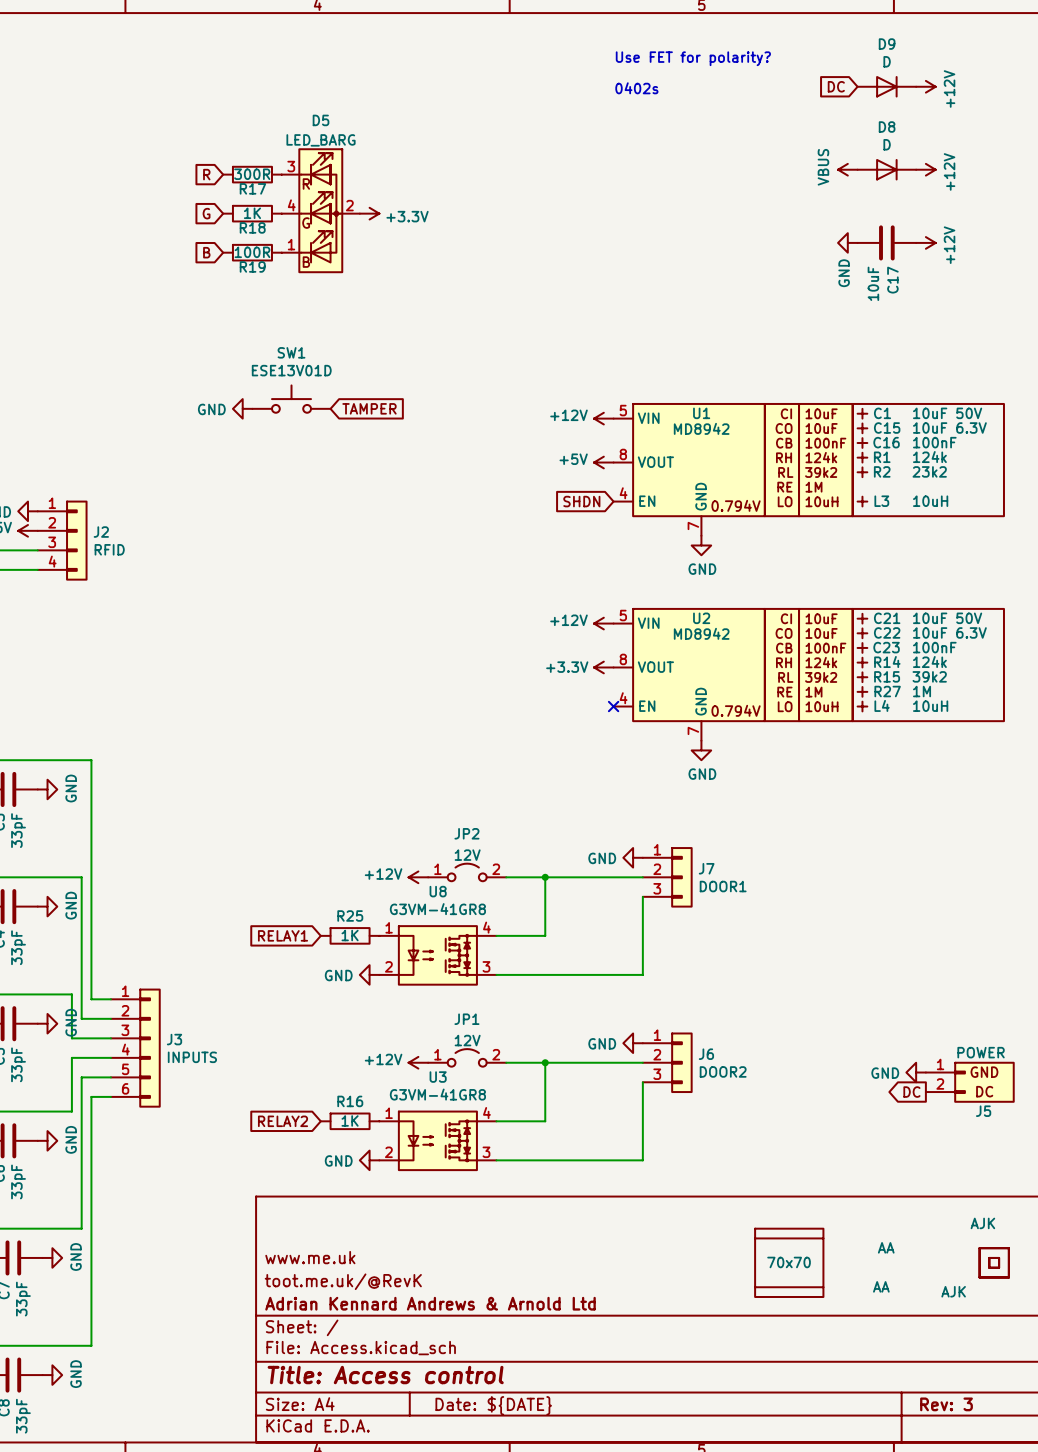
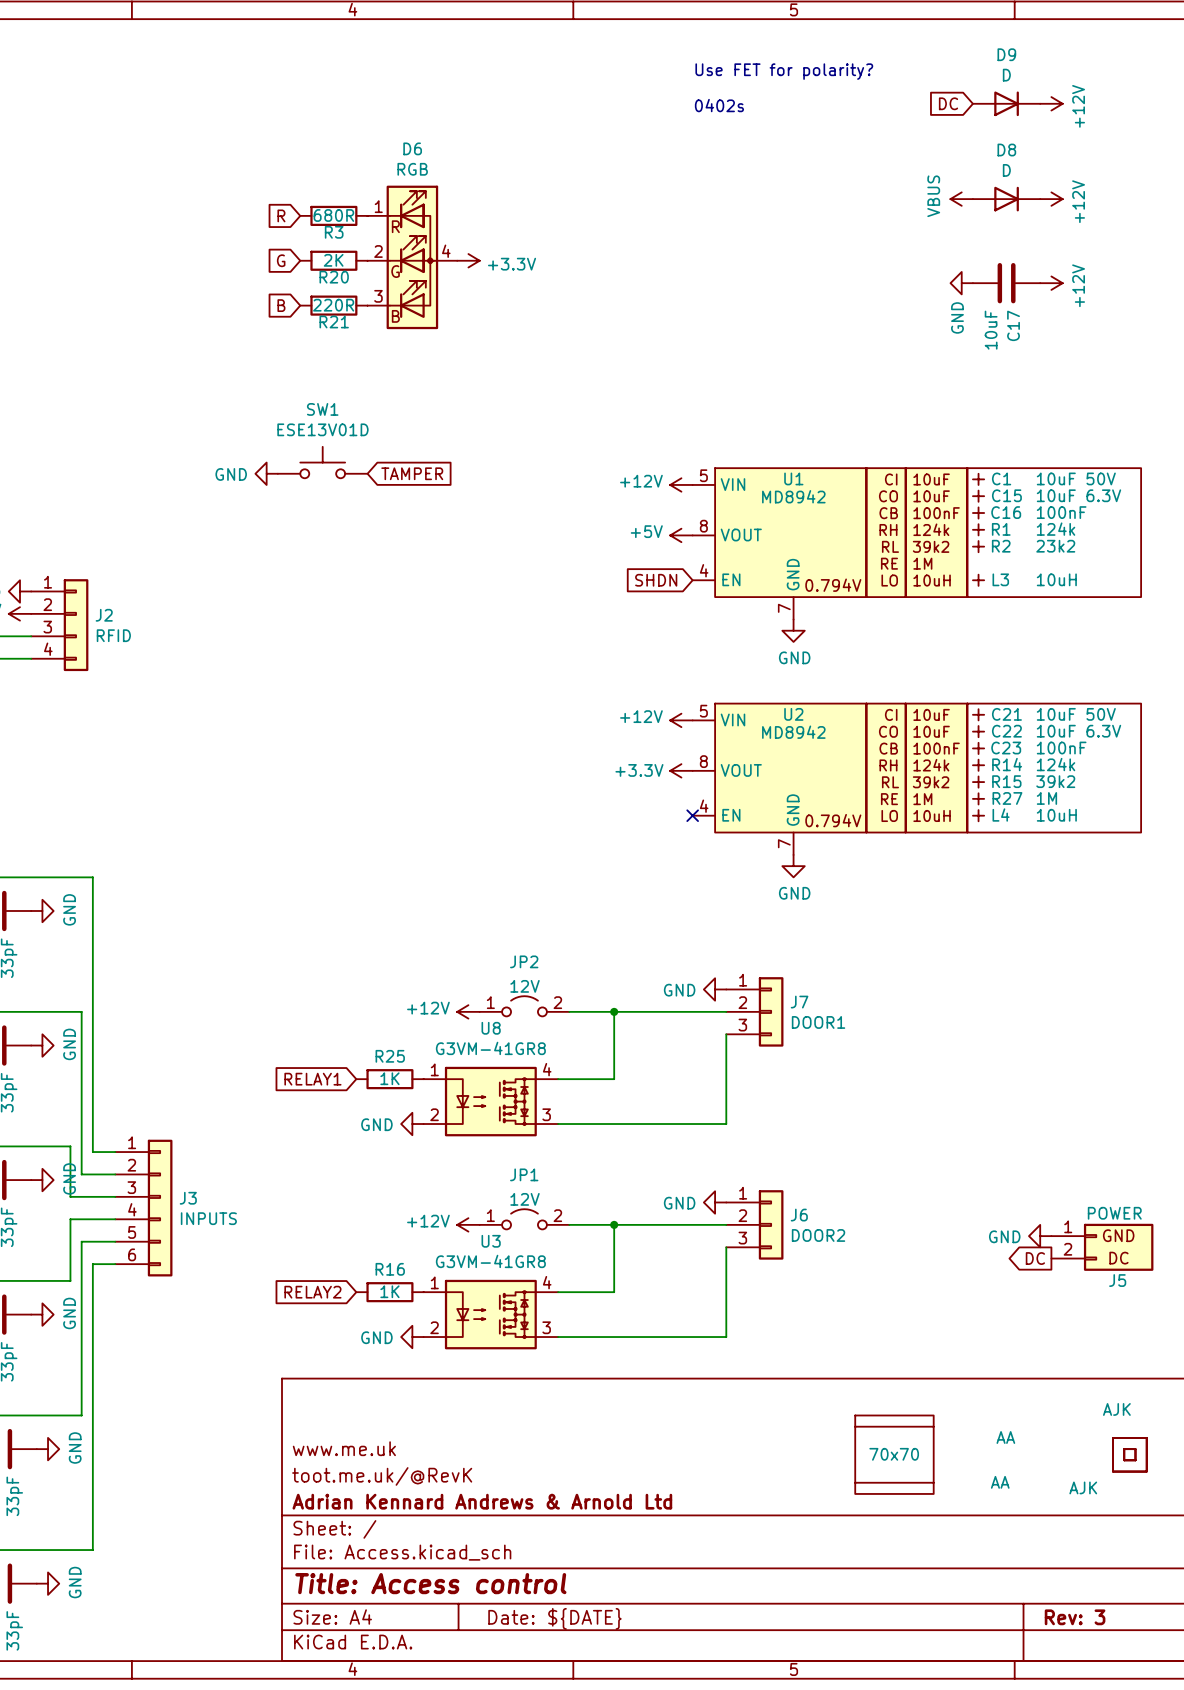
global label position: R (206, 174) -> R (281, 215)
R17: 300R (252, 174) -> none
R3: none -> 680R (333, 215)
D5: LED_BARG (320, 210) -> none
global label position: G (206, 213) -> G (281, 260)
R18: 1K (252, 213) -> none
power symbol position: +3.3V (369, 213) -> +3.3V (468, 260)
D6: none -> RGB (412, 257)
R20: none -> 2K (333, 260)
global label position: B (206, 252) -> B (281, 305)
R19: 100R (252, 252) -> none
R21: none -> 220R (333, 305)

